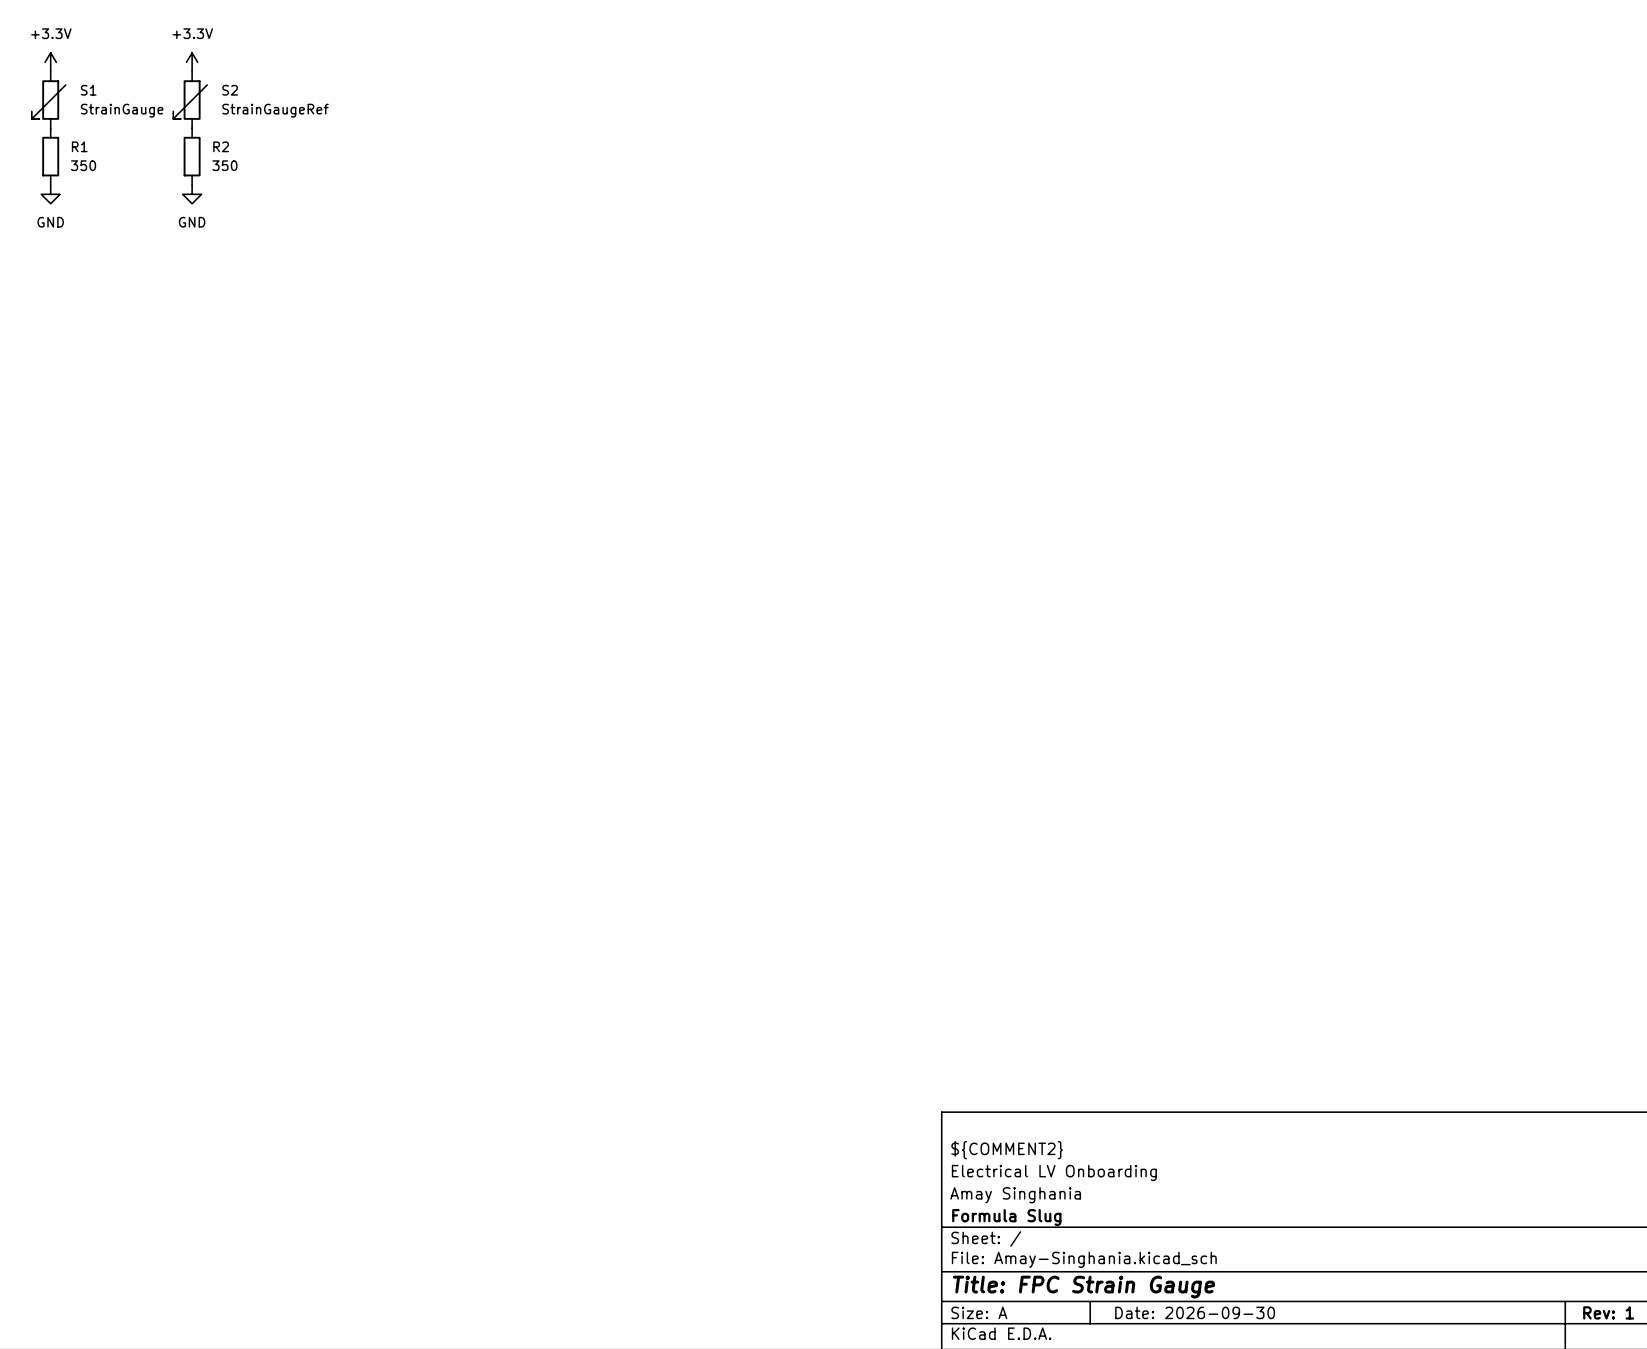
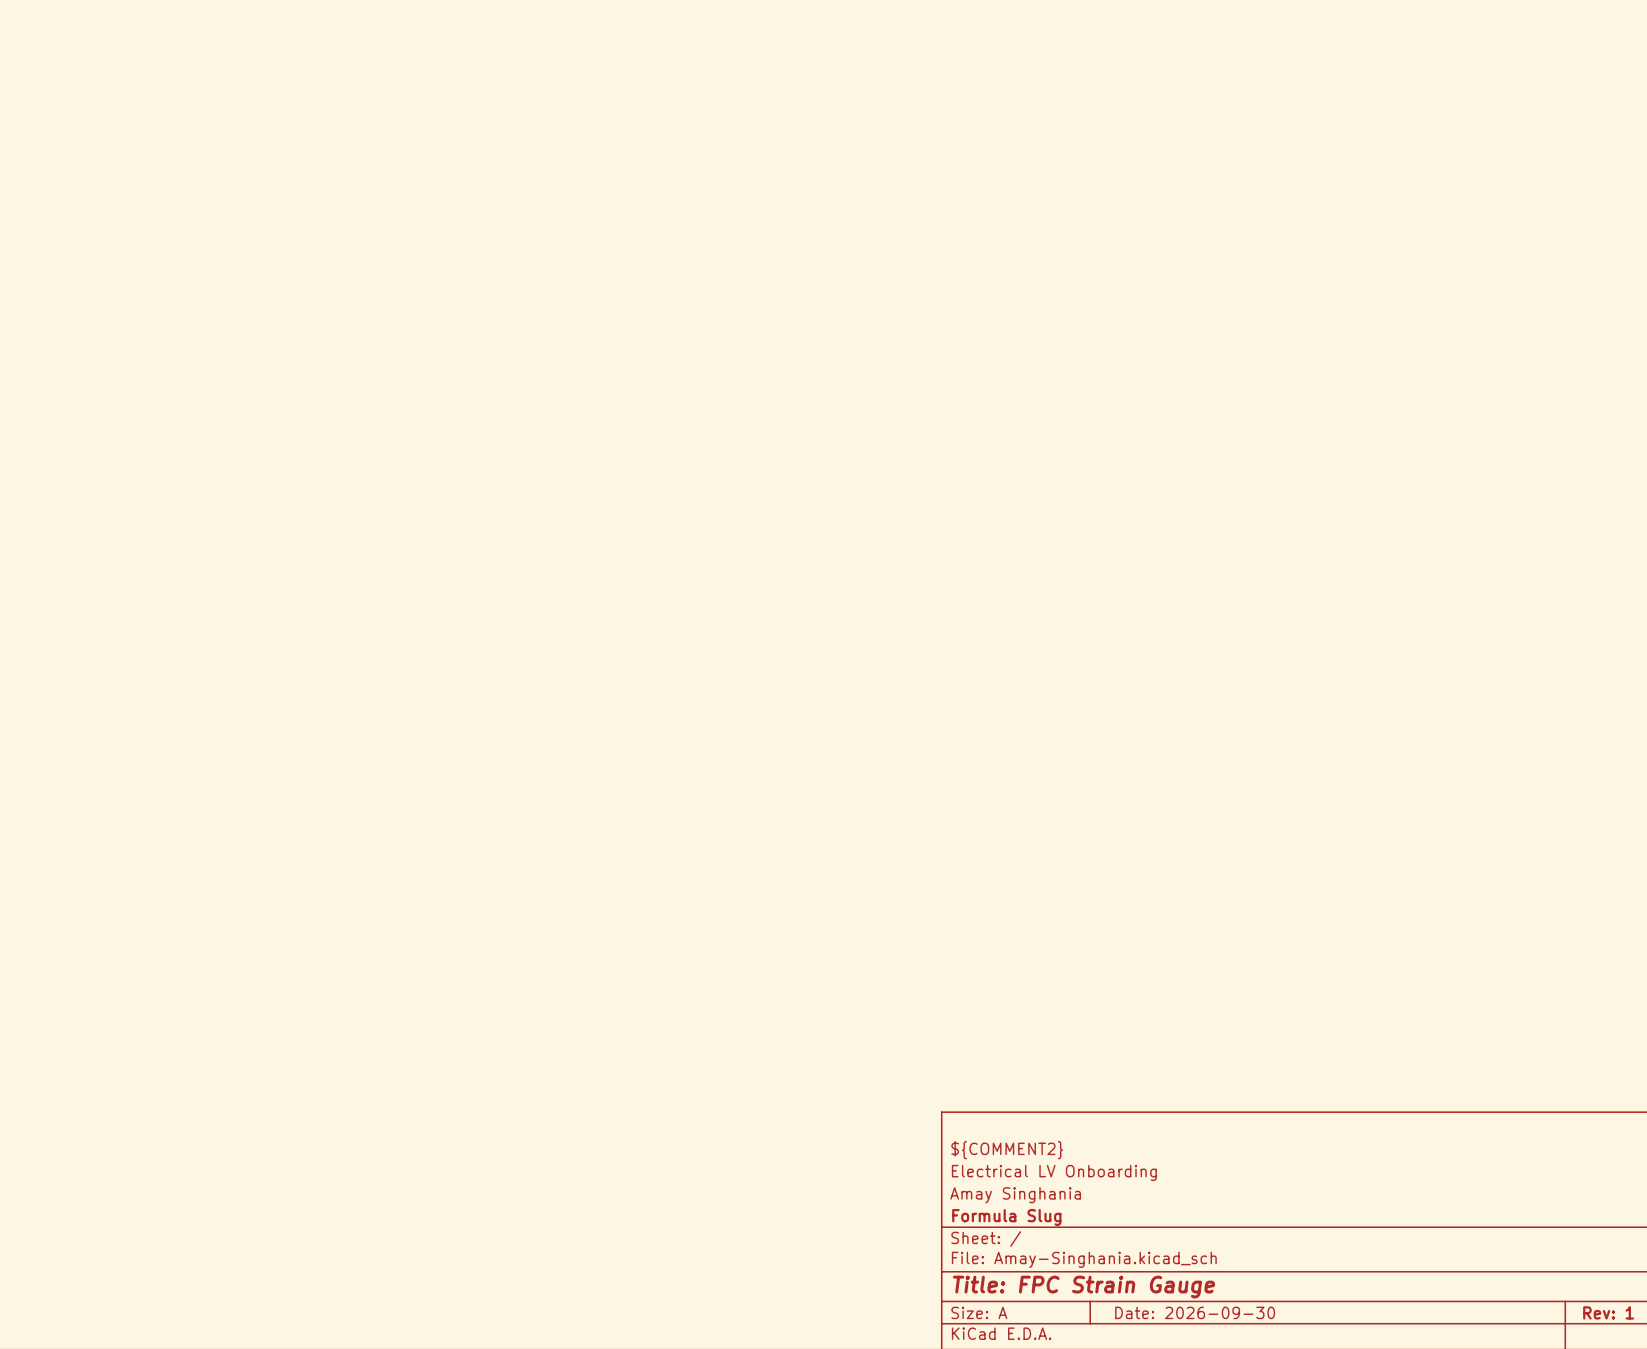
power symbol: +3.3V (50, 62) -> none
power symbol: +3.3V (192, 62) -> none
S1: StrainGauge (48, 100) -> none
S2: StrainGaugeRef (190, 100) -> none
R1: 350 (50, 156) -> none
R2: 350 (192, 156) -> none
power symbol: GND (50, 194) -> none
power symbol: GND (192, 194) -> none

